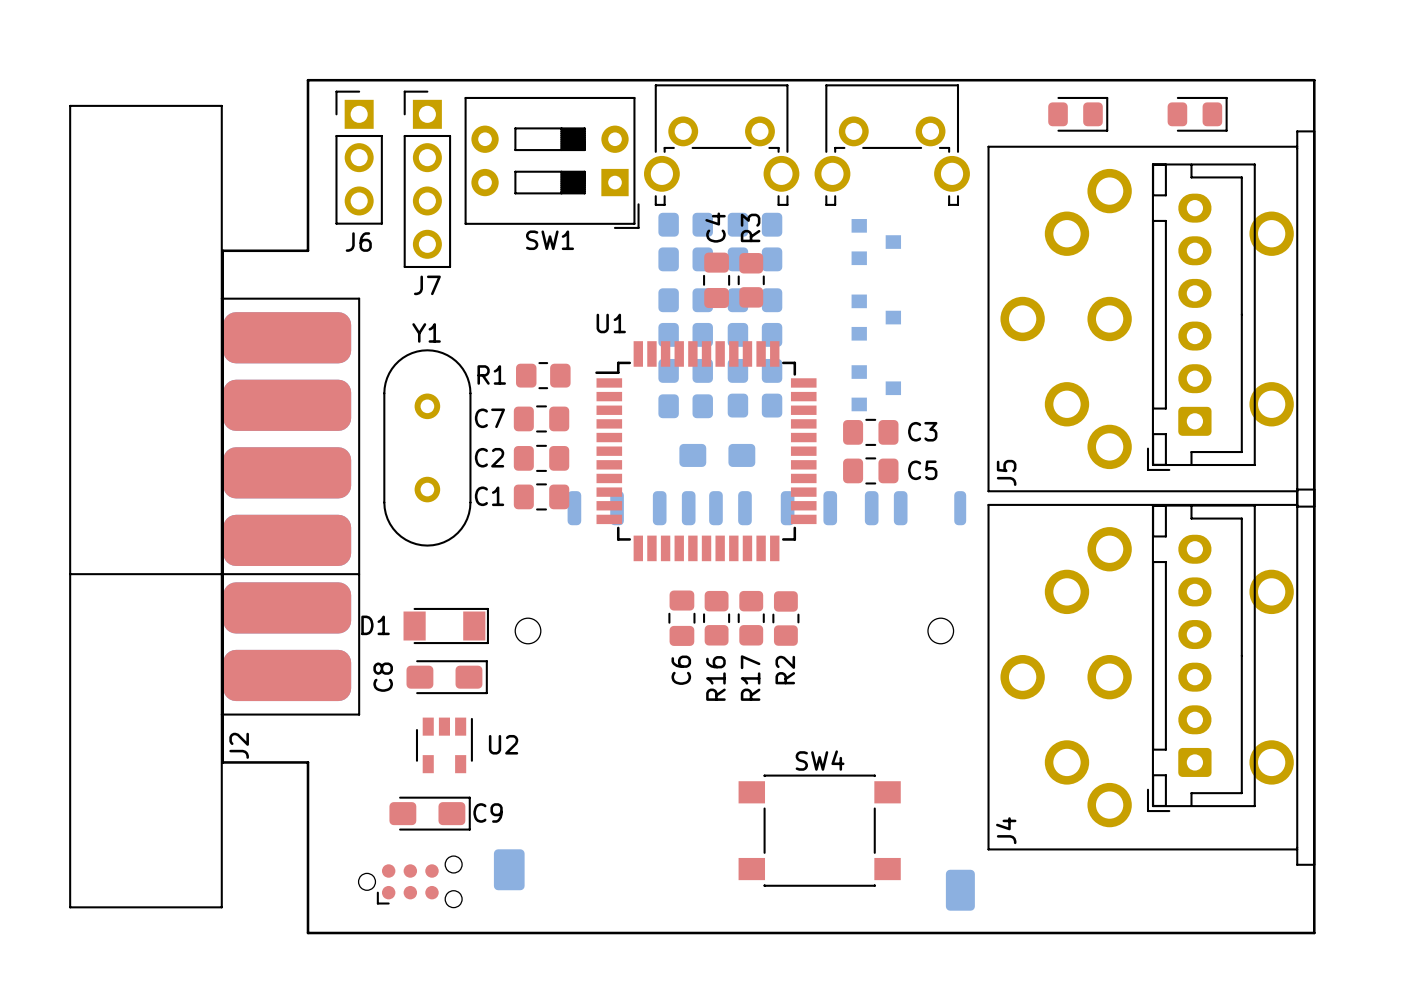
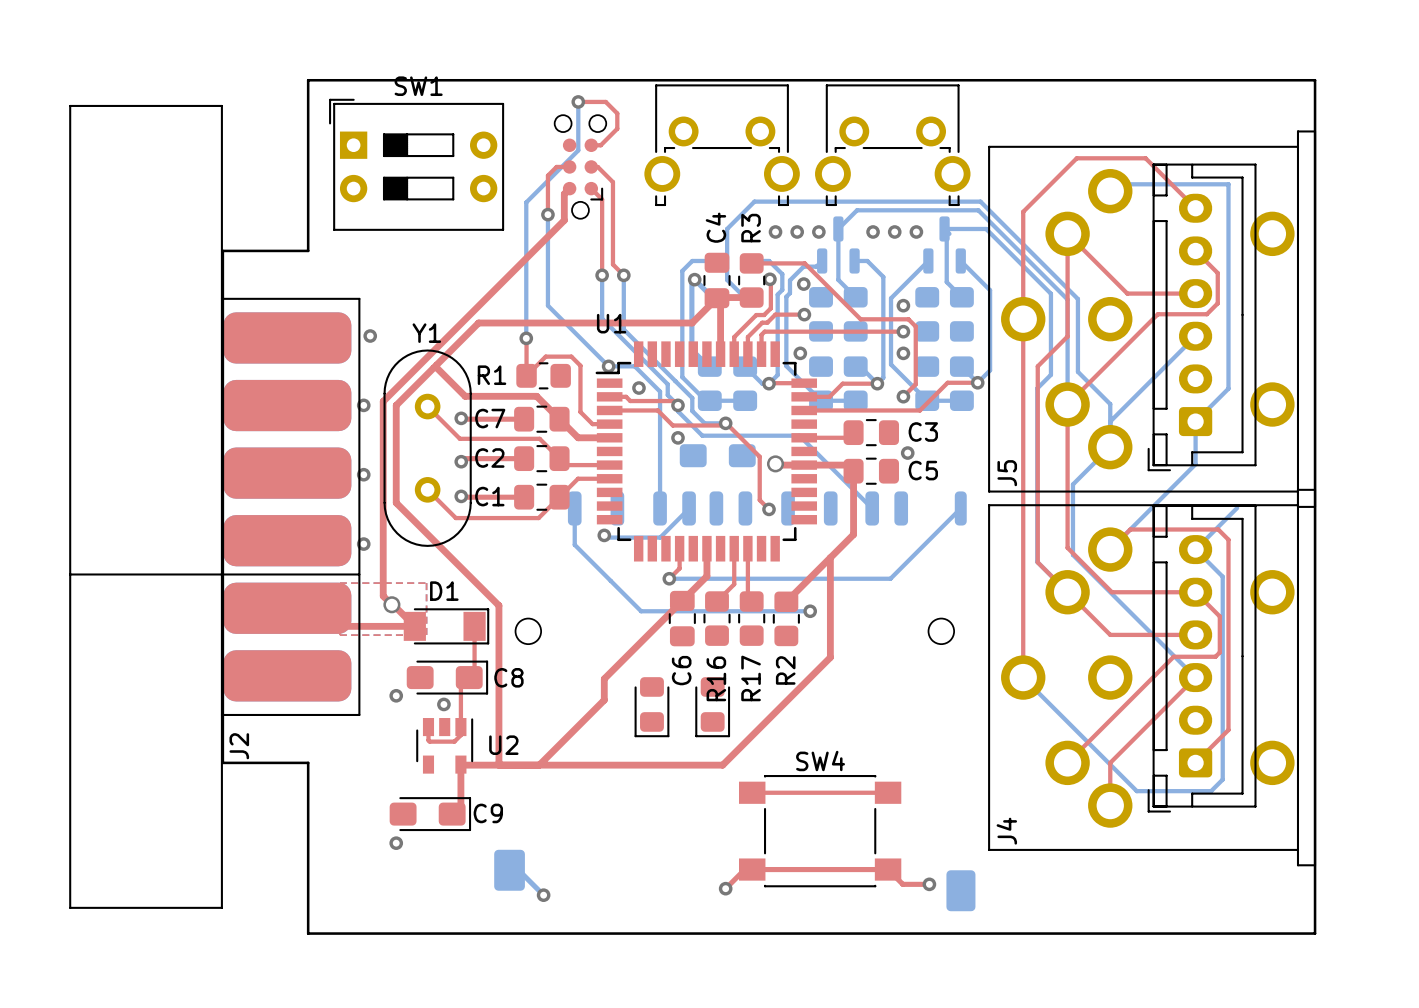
top track: none -> (578, 101) (605, 101) (617, 113) (617, 128) (600, 145) (591, 145)
bottom track: none -> (578, 101) (578, 150) (526, 202) (526, 338)
via: none -> (578, 101)
part: (1078, 114) -> none
part: (1197, 114) -> none
J6: (359, 157) -> none
SW1 rotation: 0° (552, 162) -> 180° (416, 164)
SW1 position: (552, 162) -> (416, 164)
top track: none -> (569, 166) (556, 166) (547, 175) (547, 214)
part: none -> (580, 166)
top track: none -> (591, 166) (597, 166) (612, 182) (612, 264) (623, 275)
J7: (427, 179) -> none
top track: none -> (569, 188) (564, 193) (564, 220) (383, 401) (383, 596) (414, 626) (305, 626) (287, 608)
top track: none -> (591, 188) (602, 199) (602, 275)
bottom track: none -> (1110, 191) (1117, 184) (1228, 184) (1228, 388) (1195, 421) (1195, 464) (1110, 549)
top track: none -> (1195, 208) (1145, 158) (1076, 158) (1023, 211) (1023, 677)
bottom track: none -> (547, 214) (547, 305) (608, 366) (634, 366) (660, 391) (660, 508)
via: none -> (547, 214)
part: (685, 224) -> none
part: (754, 224) -> none
via: none -> (775, 231)
via: none -> (797, 231)
via: none -> (818, 231)
via: none -> (873, 231)
via: none -> (894, 231)
via: none -> (916, 231)
bottom track: none -> (946, 231) (946, 282) (961, 297)
bottom track: none -> (949, 233) (944, 228) (986, 228) (1050, 293) (1050, 374) (1037, 388) (1037, 561) (1067, 592)
part: (876, 242) -> none
part: none -> (838, 244)
part: none -> (944, 244)
top track: none -> (1195, 250) (1217, 273) (1217, 303) (1206, 314) (1157, 314) (1067, 404) (1067, 547) (1111, 592) (1195, 592) (1219, 616) (1219, 652) (1215, 656) (1173, 656) (1067, 762)
part: (685, 259) -> none
part: (754, 259) -> none
bottom track: none -> (710, 260) (692, 260) (682, 270) (682, 377) (705, 400) (745, 400)
bottom track: none -> (743, 260) (769, 260) (782, 274) (782, 289) (777, 294) (777, 375) (769, 383) (762, 383) (745, 366)
bottom track: none -> (822, 260) (816, 266) (803, 266) (789, 280) (789, 293) (786, 296) (786, 366) (821, 400) (855, 400)
bottom track: none -> (854, 260) (867, 260) (883, 276) (883, 377) (877, 383) (860, 366) (855, 366)
bottom track: none -> (928, 260) (891, 298) (891, 364) (927, 400) (961, 400)
bottom track: none -> (960, 260) (990, 290) (990, 370) (977, 382) (961, 366)
top track: none -> (751, 263) (804, 263) (860, 319) (908, 319) (915, 326) (915, 384) (903, 396)
bottom track: none -> (602, 275) (602, 318) (667, 384) (667, 395) (677, 405) (677, 411) (702, 435) (799, 435) (872, 508)
via: none -> (602, 275)
bottom track: none -> (623, 275) (623, 329) (692, 398) (692, 411) (704, 423) (725, 423)
via: none -> (623, 275)
via: none -> (694, 279)
top track: none -> (769, 279) (770, 308) (764, 315) (756, 315) (734, 337) (734, 354)
via: none -> (769, 279)
via: none -> (803, 284)
top track: none -> (1195, 293) (1127, 293) (1067, 233) (1067, 336) (1037, 366) (1037, 562) (1110, 634) (1195, 634)
bottom track: none -> (709, 297) (709, 294) (694, 279) (691, 282) (691, 349) (709, 366)
bottom track: none -> (744, 297) (727, 279) (727, 228) (754, 201) (980, 201) (1077, 299) (1077, 371) (1110, 404) (1110, 447) (1072, 484) (1072, 554) (1195, 677)
top track: none -> (751, 297) (717, 297) (692, 323) (478, 323) (436, 365) (436, 367)
bottom track: none -> (855, 297) (838, 279) (838, 228) (857, 210) (978, 210) (1067, 299) (1067, 404)
top track: none -> (717, 298) (720, 301) (720, 354)
part: (685, 300) -> none
part: (754, 300) -> none
via: none -> (903, 305)
top track: none -> (804, 314) (775, 314) (767, 322) (762, 322) (747, 337) (747, 354)
via: none -> (804, 314)
part: none -> (821, 314)
part: none -> (855, 314)
part: none -> (927, 314)
part: none -> (961, 314)
part: (876, 317) -> none
top track: none -> (903, 331) (764, 331) (761, 334) (761, 354)
via: none -> (903, 331)
part: (685, 334) -> none
part: (754, 334) -> none
via: none -> (370, 336)
bottom track: none -> (1195, 336) (1110, 421)
top track: none -> (526, 338) (526, 375) (545, 356) (571, 356) (580, 365) (580, 412) (592, 424) (609, 424)
via: none -> (526, 338)
via: none -> (800, 353)
via: none -> (903, 353)
via: none -> (608, 366)
top track: none -> (436, 367) (434, 367) (396, 405) (396, 502) (498, 605) (498, 765)
top track: none -> (436, 367) (465, 396) (536, 396) (578, 437) (609, 437)
part: (685, 370) -> none
part: (754, 370) -> none
top track: none -> (804, 383) (769, 383)
top track: none -> (977, 382) (947, 382) (919, 410) (804, 410)
via: none -> (977, 382)
part: none -> (709, 383)
part: none -> (745, 383)
via: none -> (769, 383)
part: none -> (821, 383)
part: none -> (855, 383)
top track: none -> (877, 383) (842, 383) (829, 396) (804, 396)
via: none -> (877, 383)
part: none -> (927, 383)
part: none -> (961, 383)
via: none -> (638, 388)
part: (876, 388) -> none
top track: none -> (609, 396) (626, 396) (630, 401) (673, 401) (677, 405)
via: none -> (903, 396)
via: none -> (363, 405)
via: none -> (677, 405)
part: (754, 405) -> none
top track: none -> (427, 406) (459, 438) (539, 438) (565, 465) (609, 465)
part: (685, 406) -> none
top track: none -> (609, 410) (657, 410) (672, 425) (723, 425) (726, 423) (759, 456) (759, 500) (769, 509)
top track: none -> (461, 418) (524, 419)
via: none -> (461, 418)
via: none -> (725, 423)
top track: none -> (853, 432) (848, 437) (804, 437)
via: none -> (677, 437)
via: none -> (907, 453)
top track: none -> (524, 458) (464, 458) (461, 461)
via: none -> (461, 461)
top track: none -> (775, 463) (847, 465) (853, 471) (853, 534) (786, 601)
via: none -> (775, 463)
via: none -> (363, 474)
top track: none -> (609, 478) (578, 478) (538, 518) (455, 518) (427, 489)
top track: none -> (461, 496) (524, 497)
via: none -> (461, 496)
bottom track: none -> (1237, 508) (1195, 549) (1222, 576) (1222, 779) (1211, 791) (1136, 791) (1023, 677)
bottom track: none -> (574, 508) (574, 544) (641, 611) (810, 611)
bottom track: none -> (689, 508) (660, 537) (606, 537) (604, 535)
bottom track: none -> (960, 508) (890, 578) (669, 578)
via: none -> (769, 509)
via: none -> (604, 535)
via: none -> (363, 544)
top track: none -> (679, 548) (679, 568) (669, 578)
top track: none -> (706, 548) (706, 576) (604, 678) (604, 700) (539, 765)
top track: none -> (734, 548) (734, 584) (717, 601)
top track: none -> (747, 548) (747, 597) (751, 601)
top track: none -> (1110, 549) (1130, 529) (1218, 529) (1228, 539) (1228, 729) (1195, 762)
top track: none -> (830, 557) (830, 657) (722, 765) (460, 765) (460, 805) (452, 814)
via: none -> (669, 578)
top zone outline: none -> (339, 583) (339, 635) (426, 635) (426, 583) (339, 583)
via: none -> (391, 604)
via: none -> (810, 611)
D1 name position: D1 (375, 625) -> D1 (444, 591)
top track: none -> (474, 626) (474, 672) (460, 685) (460, 735) (454, 741) (429, 741) (428, 727)
C8 name rotation: 0° (383, 677) -> 90° clockwise (508, 677)
C8 name position: C8 (383, 677) -> C8 (508, 677)
top track: none -> (1195, 677) (1110, 762) (1110, 805)
via: none -> (396, 695)
via: none -> (443, 704)
part: none -> (651, 707)
part: none -> (712, 707)
top track: none -> (752, 792) (888, 792)
via: none -> (396, 843)
bottom track: none -> (509, 870) (518, 870) (543, 895)
part: (410, 881) -> none
top track: none -> (929, 884) (902, 884) (888, 869) (744, 869) (725, 888)
via: none -> (929, 884)
via: none -> (725, 888)
via: none -> (543, 895)

